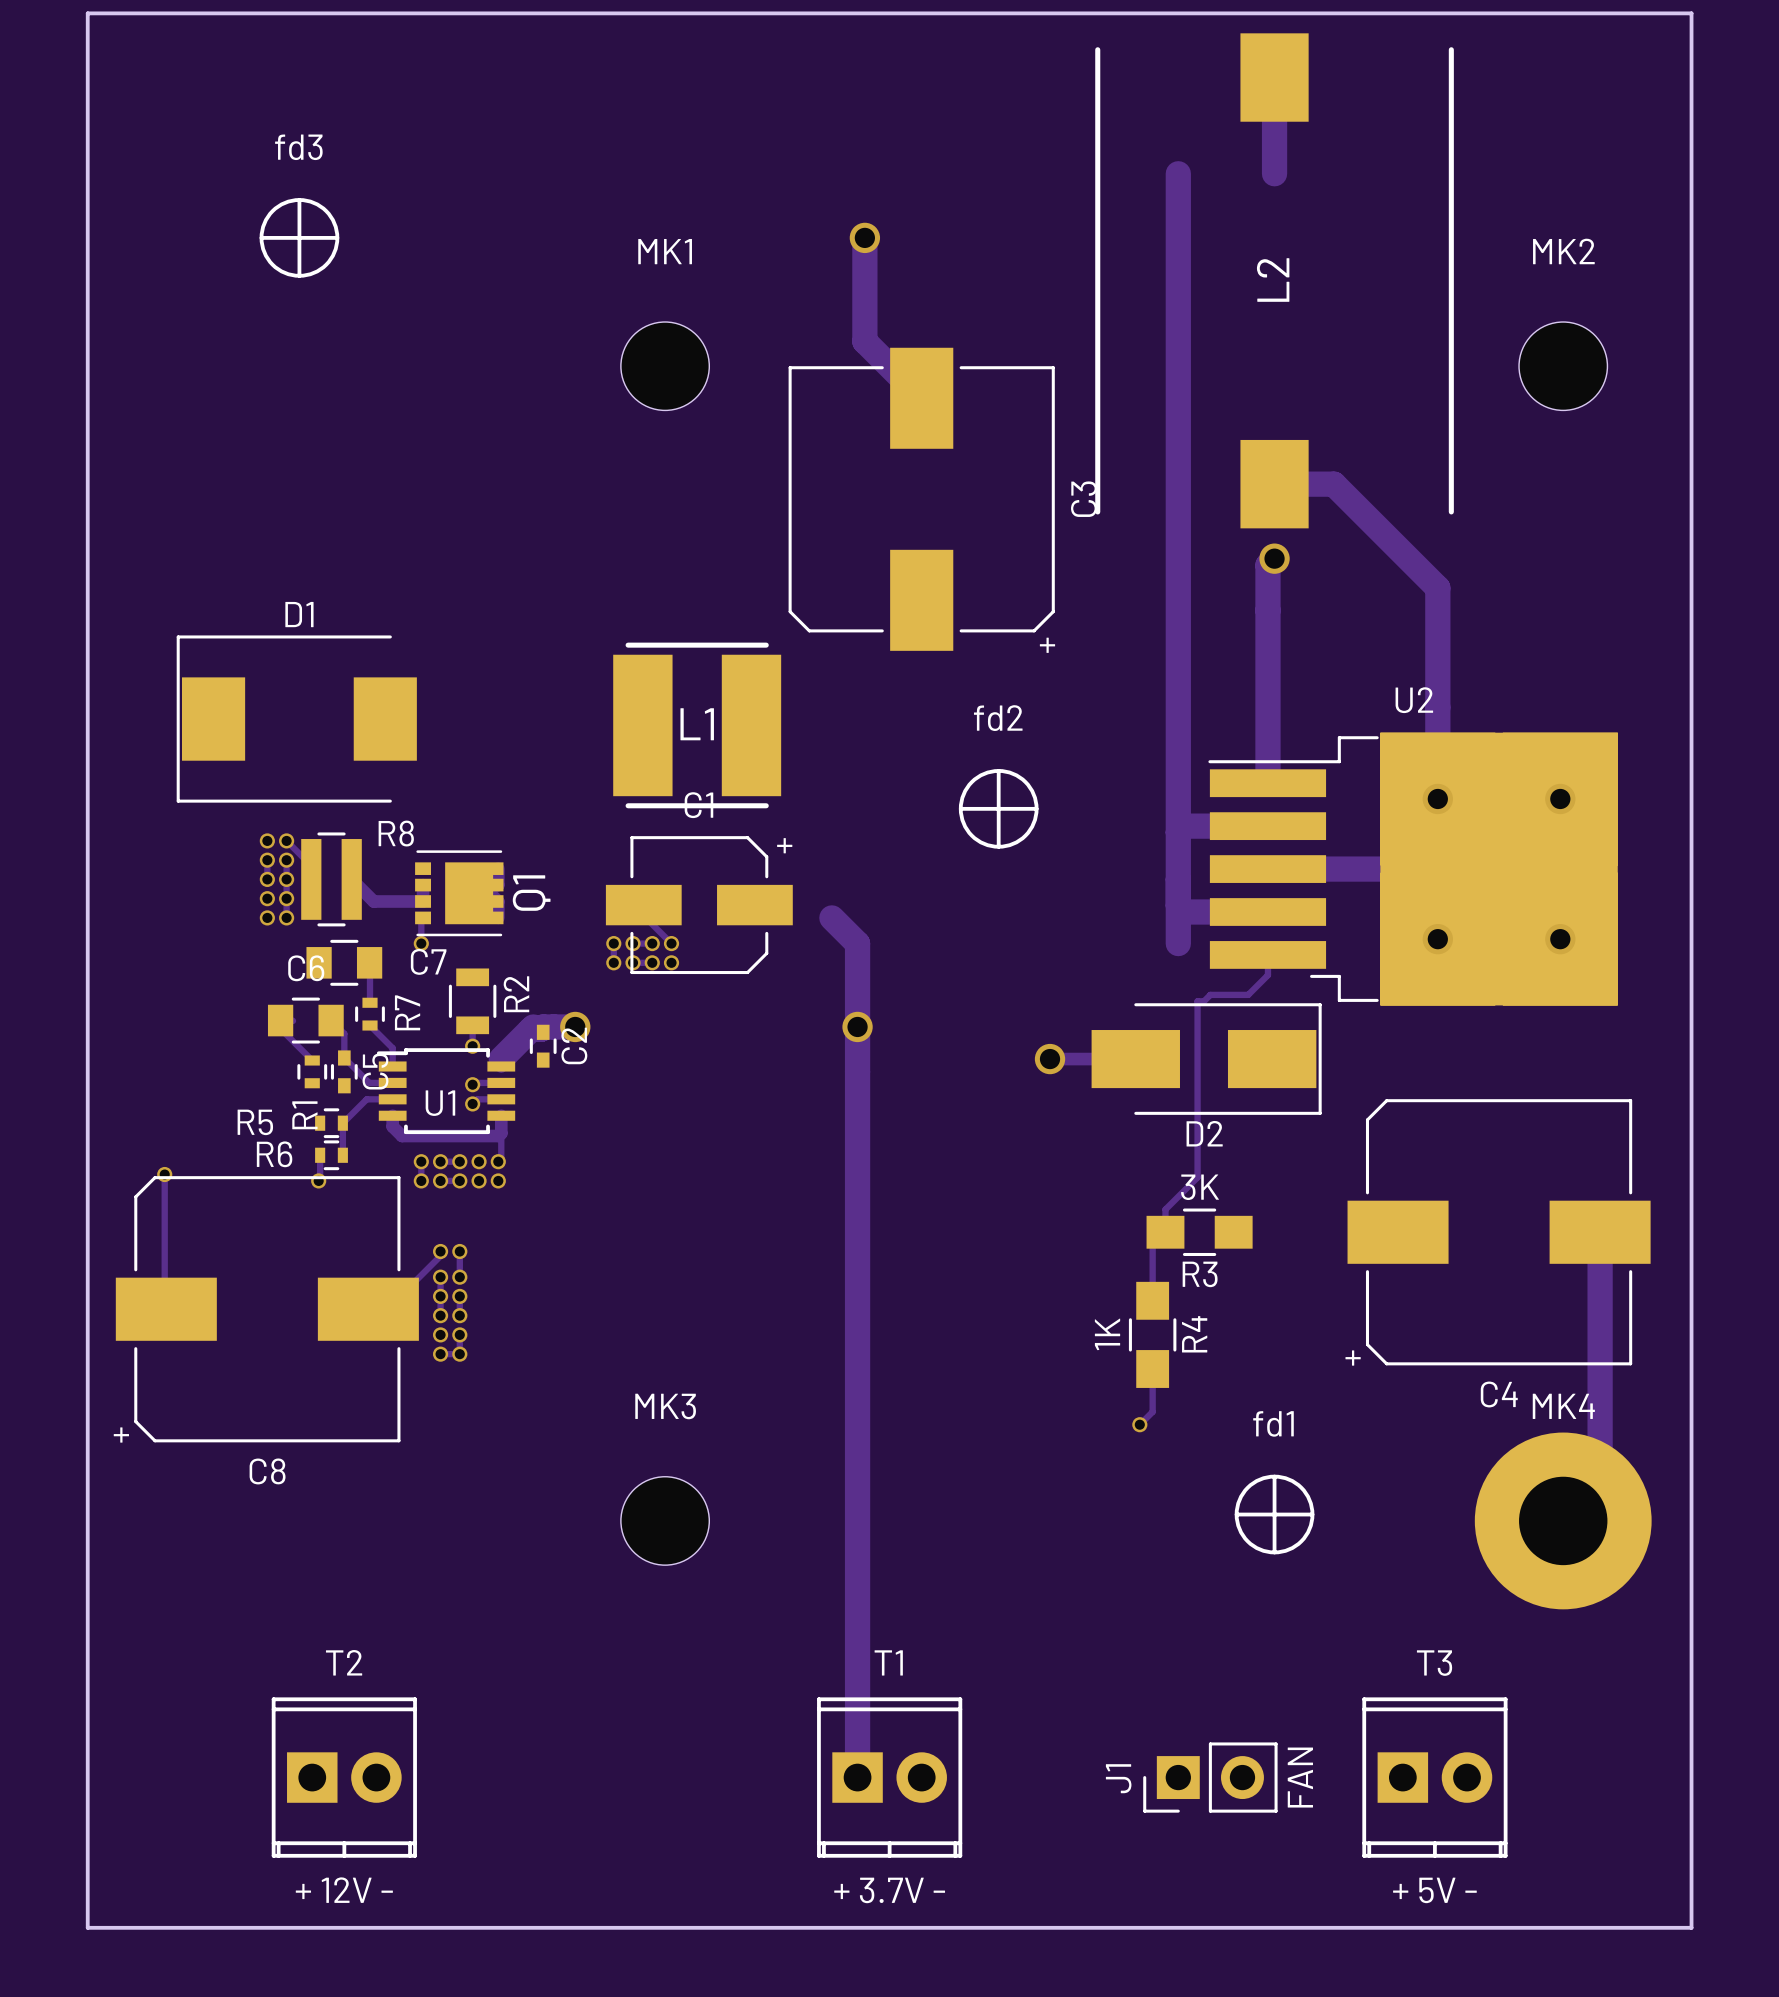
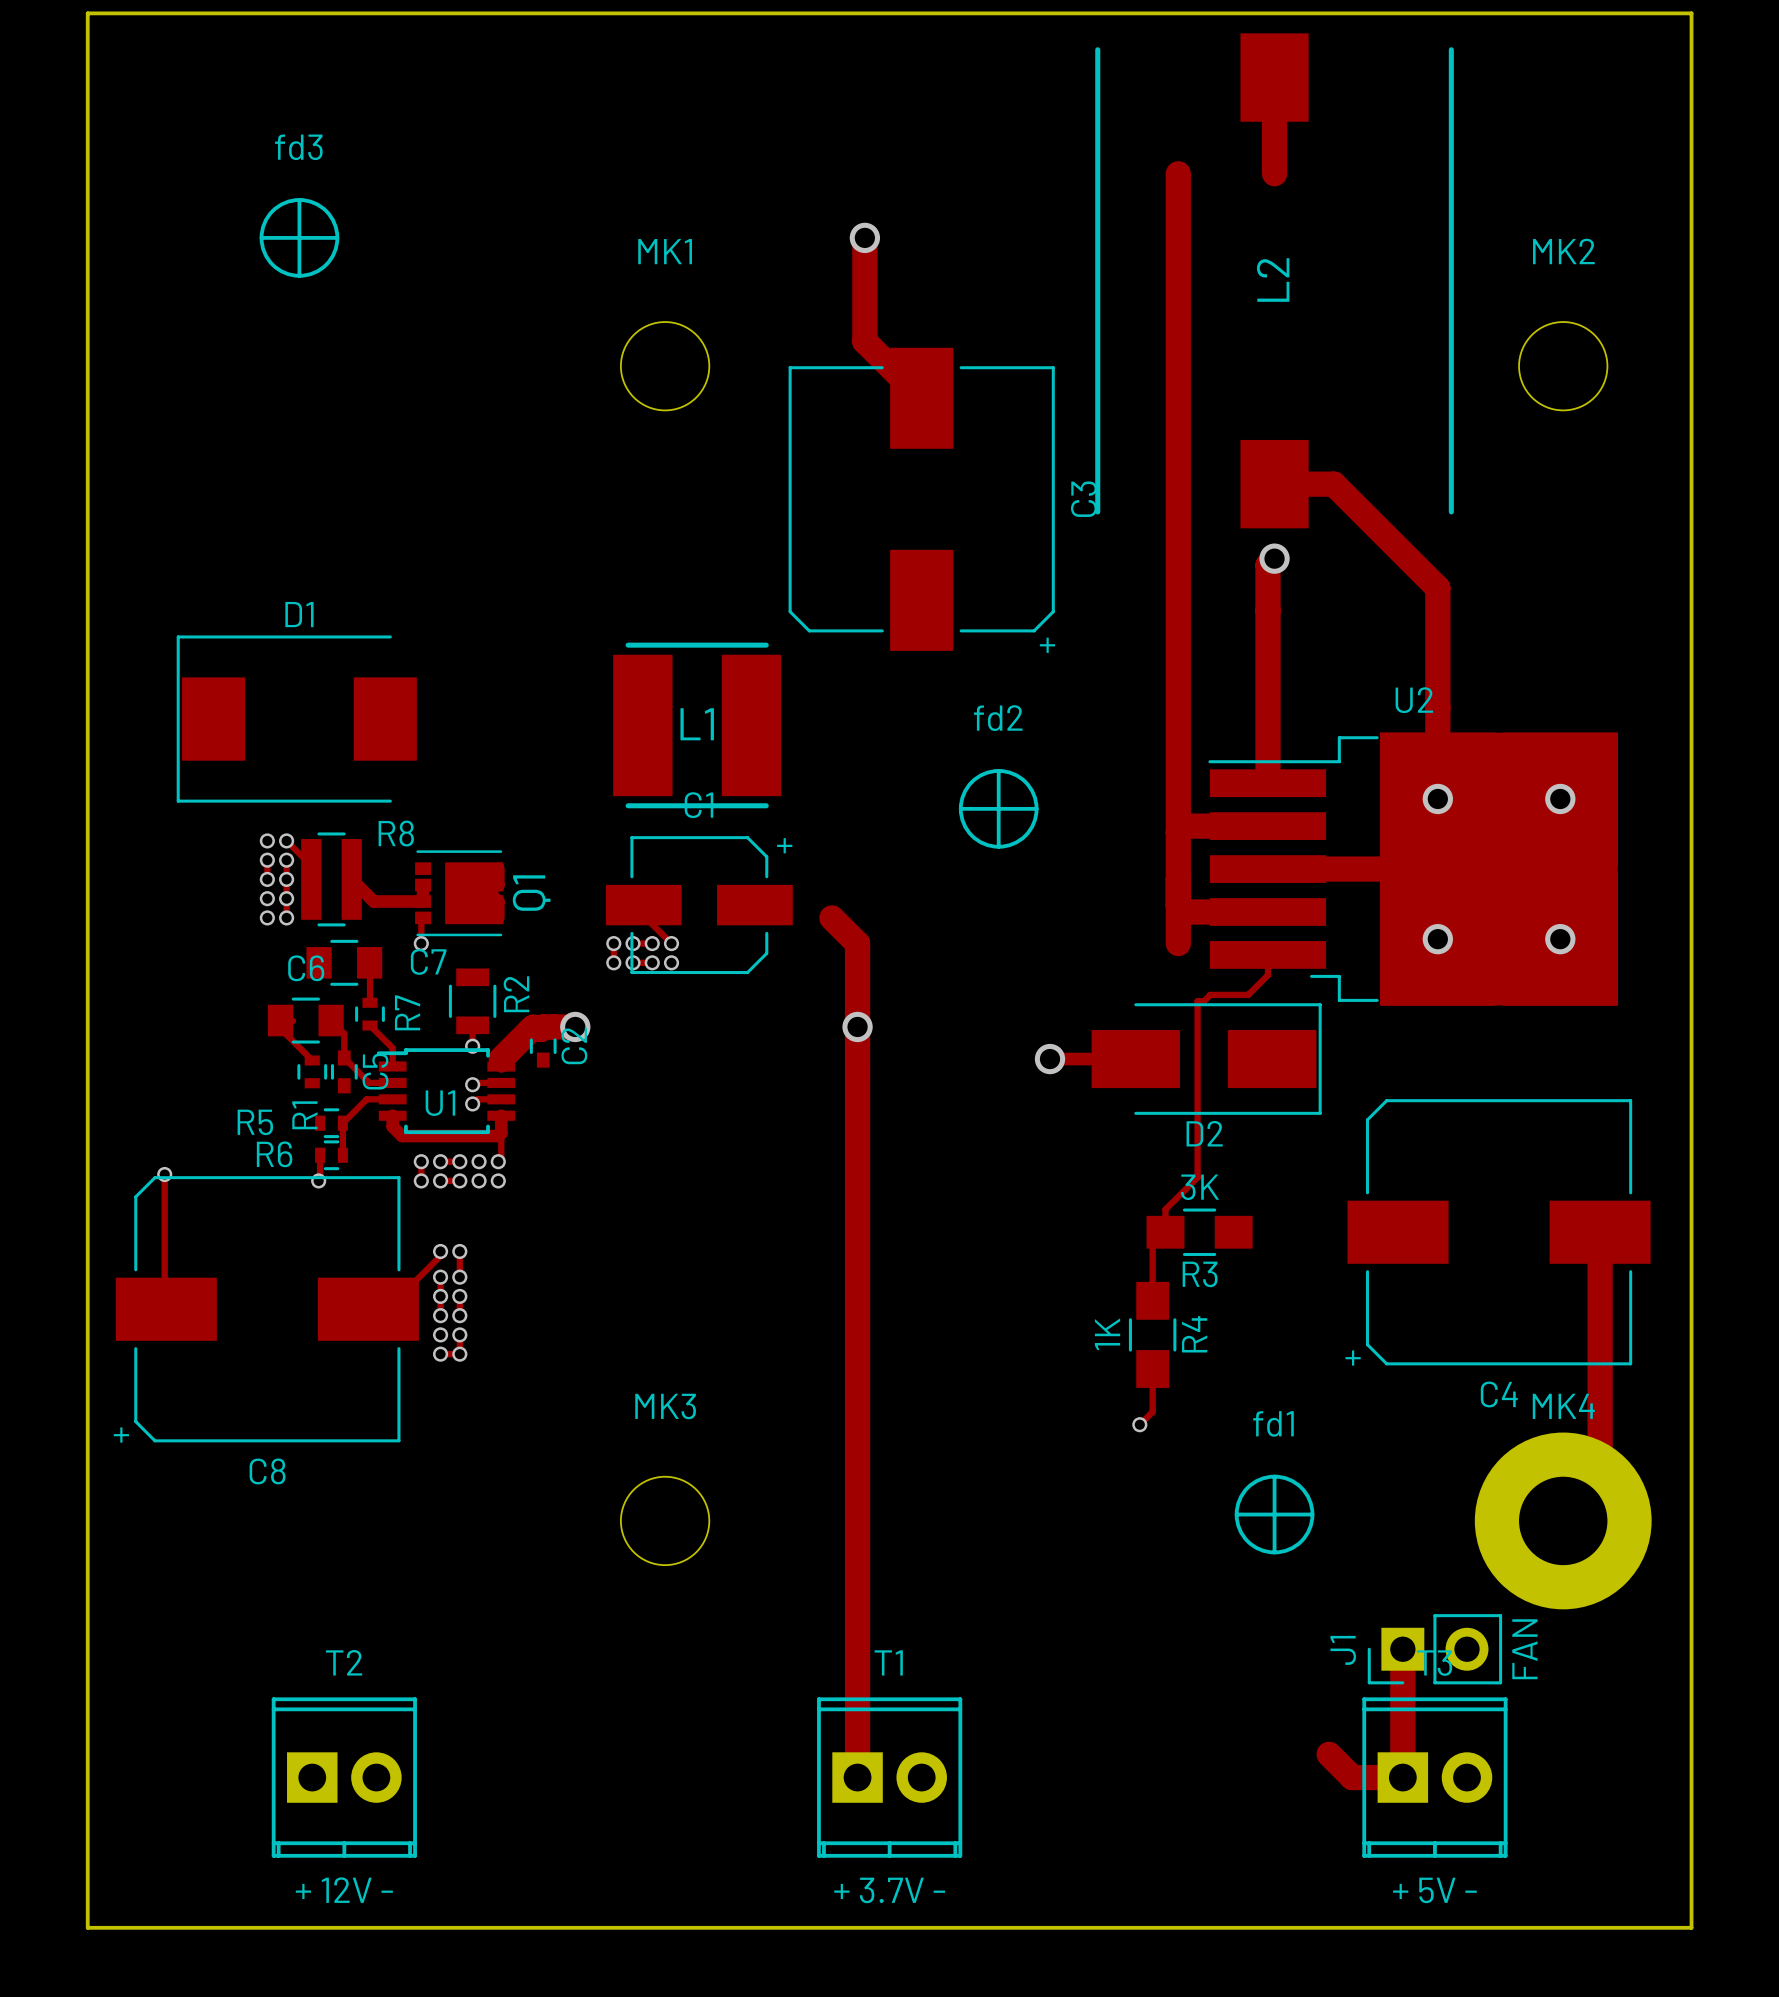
track: none -> (1402, 1649) (1402, 1777) (1352, 1777) (1329, 1754)
J1 position: (1210, 1777) -> (1434, 1649)

